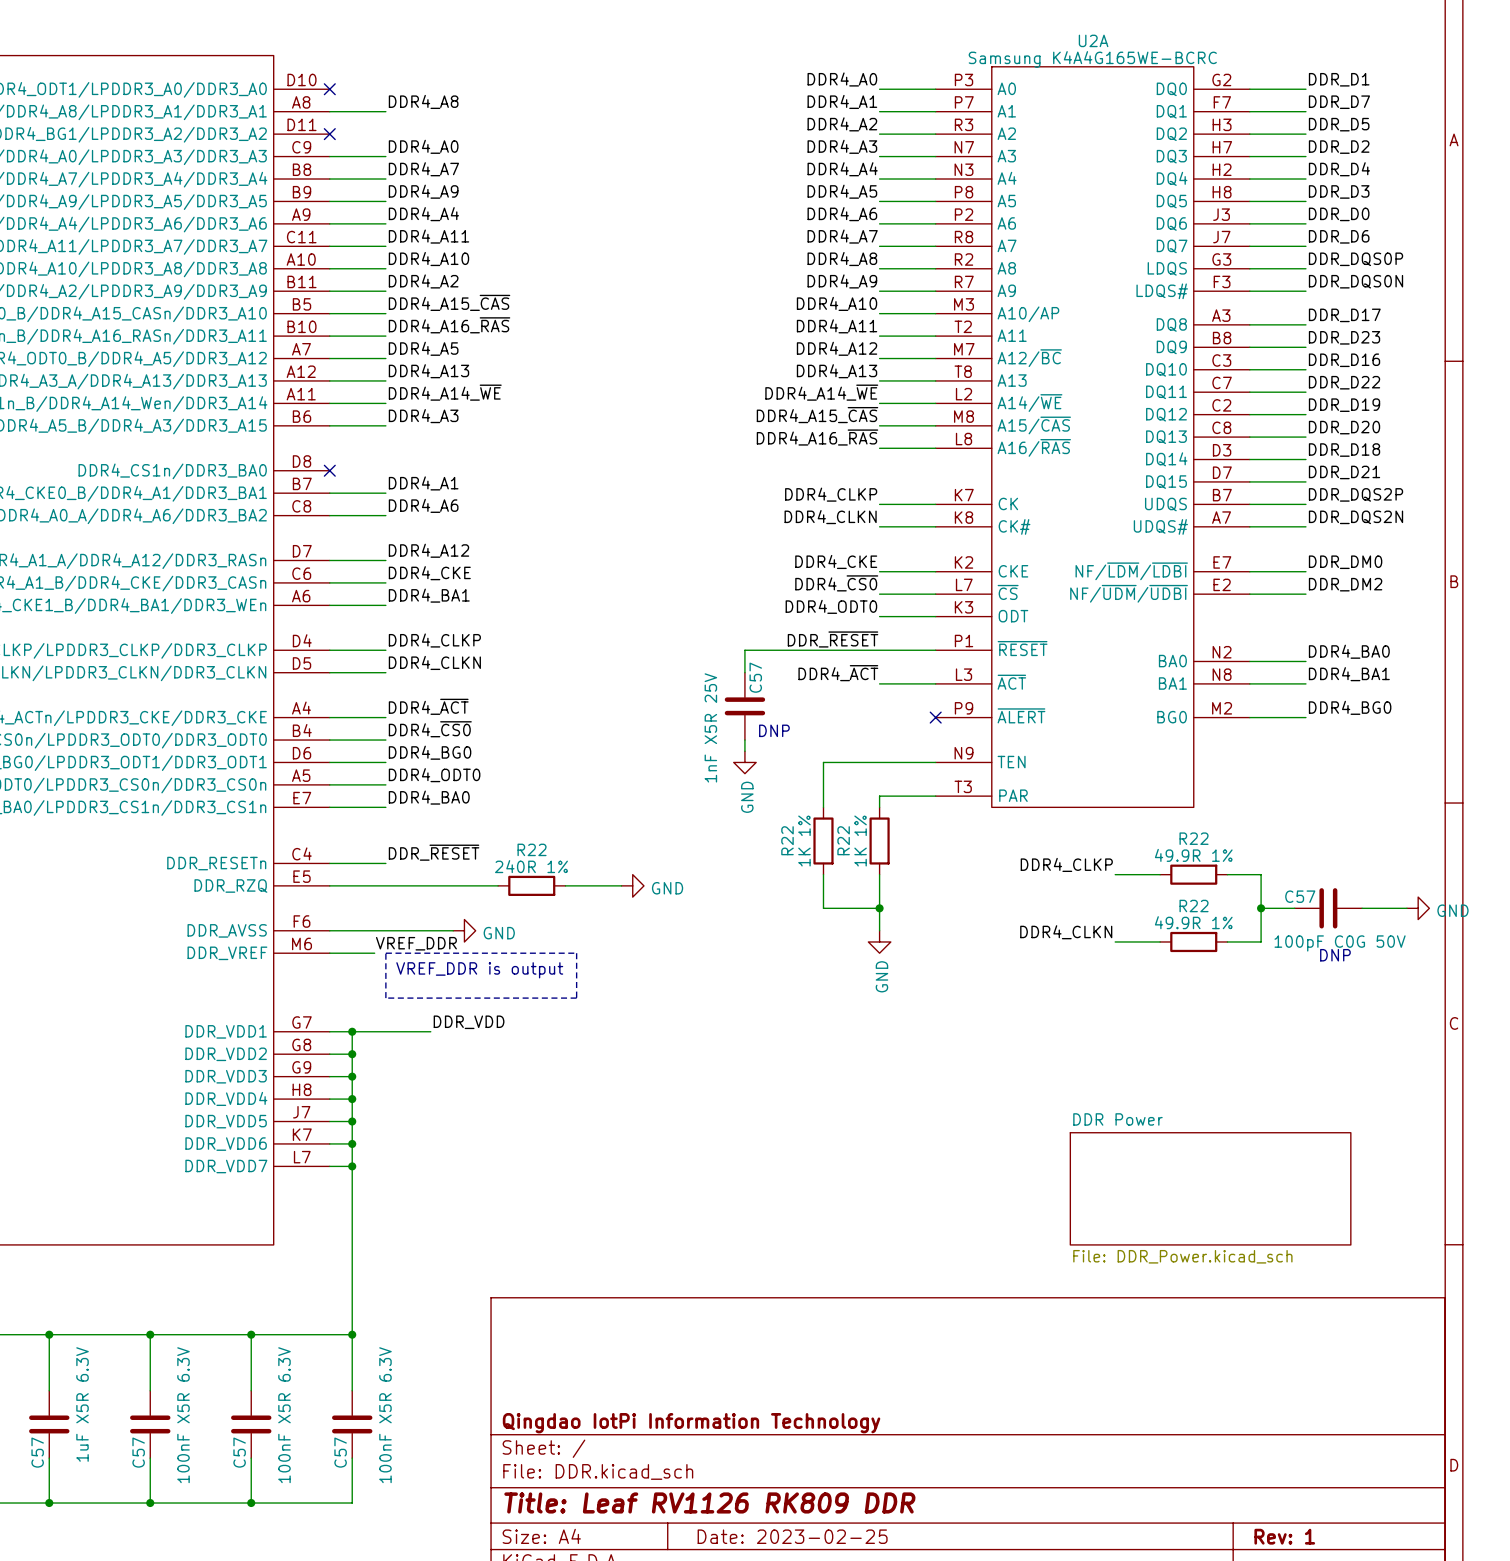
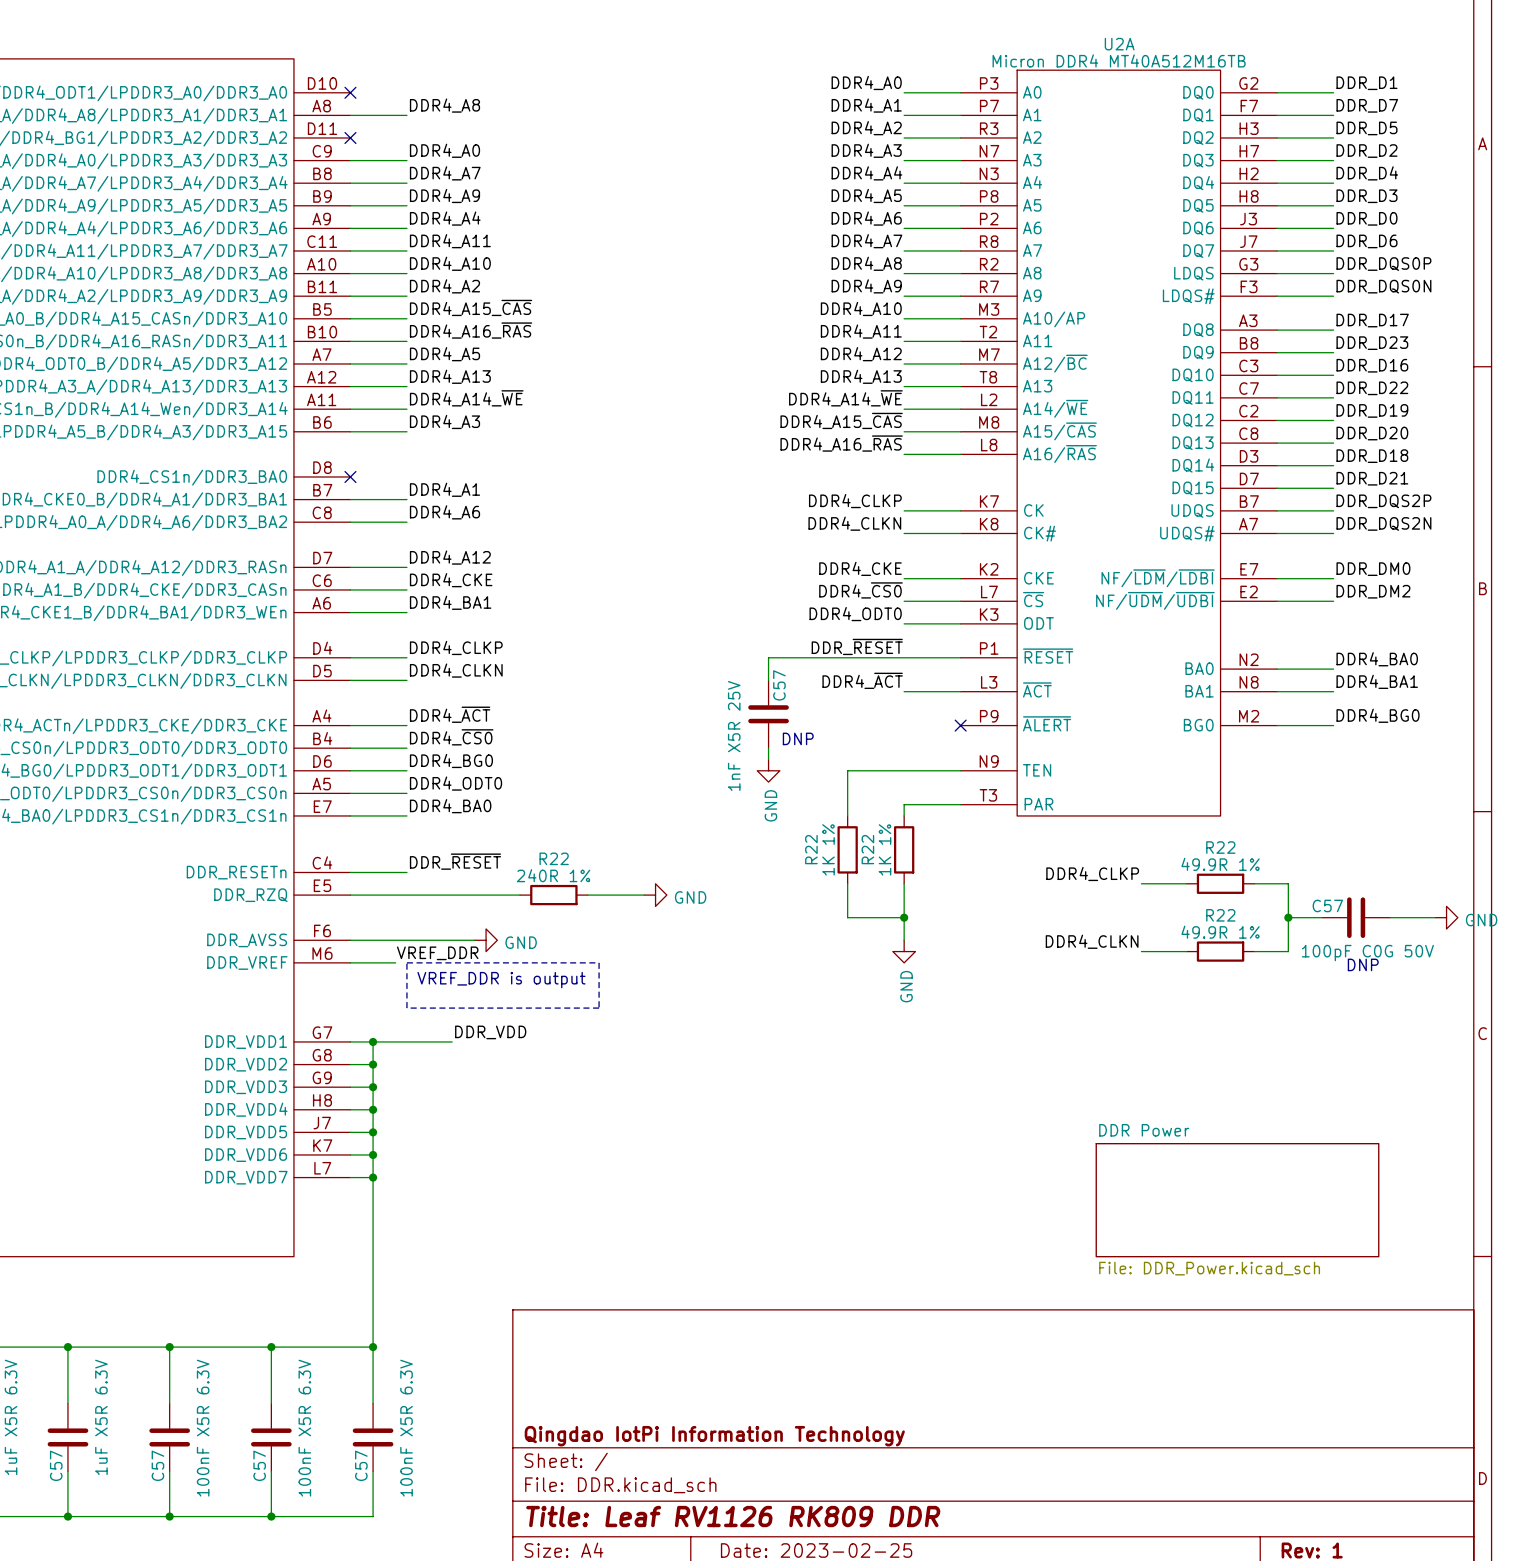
U2A value: Samsung K4A4G165WE-BCRC (1092, 59) -> Micron DDR4 MT40A512M16TB (1119, 60)

